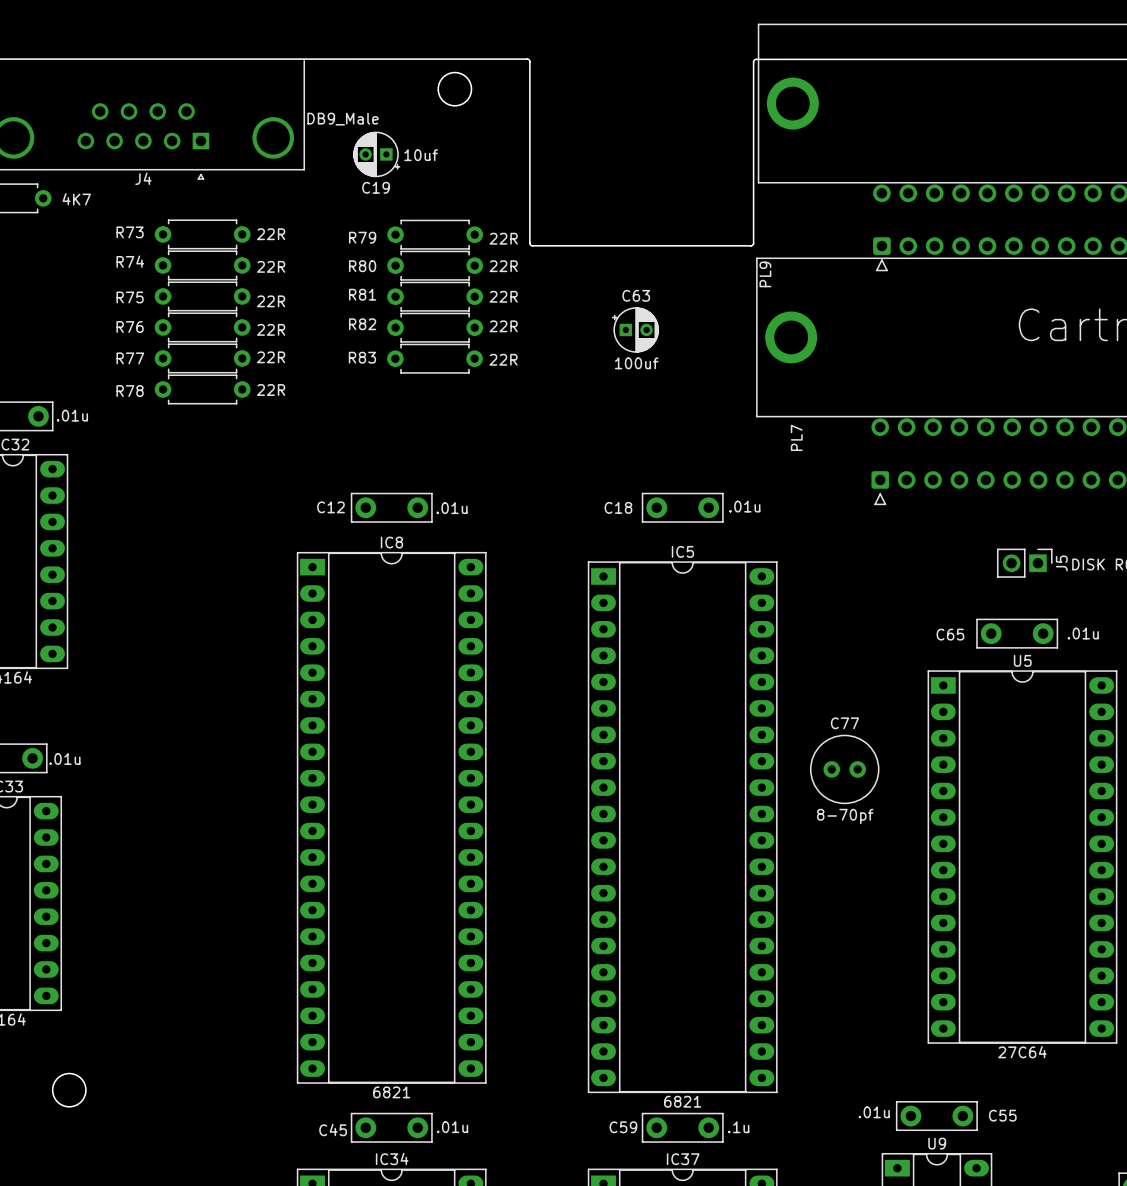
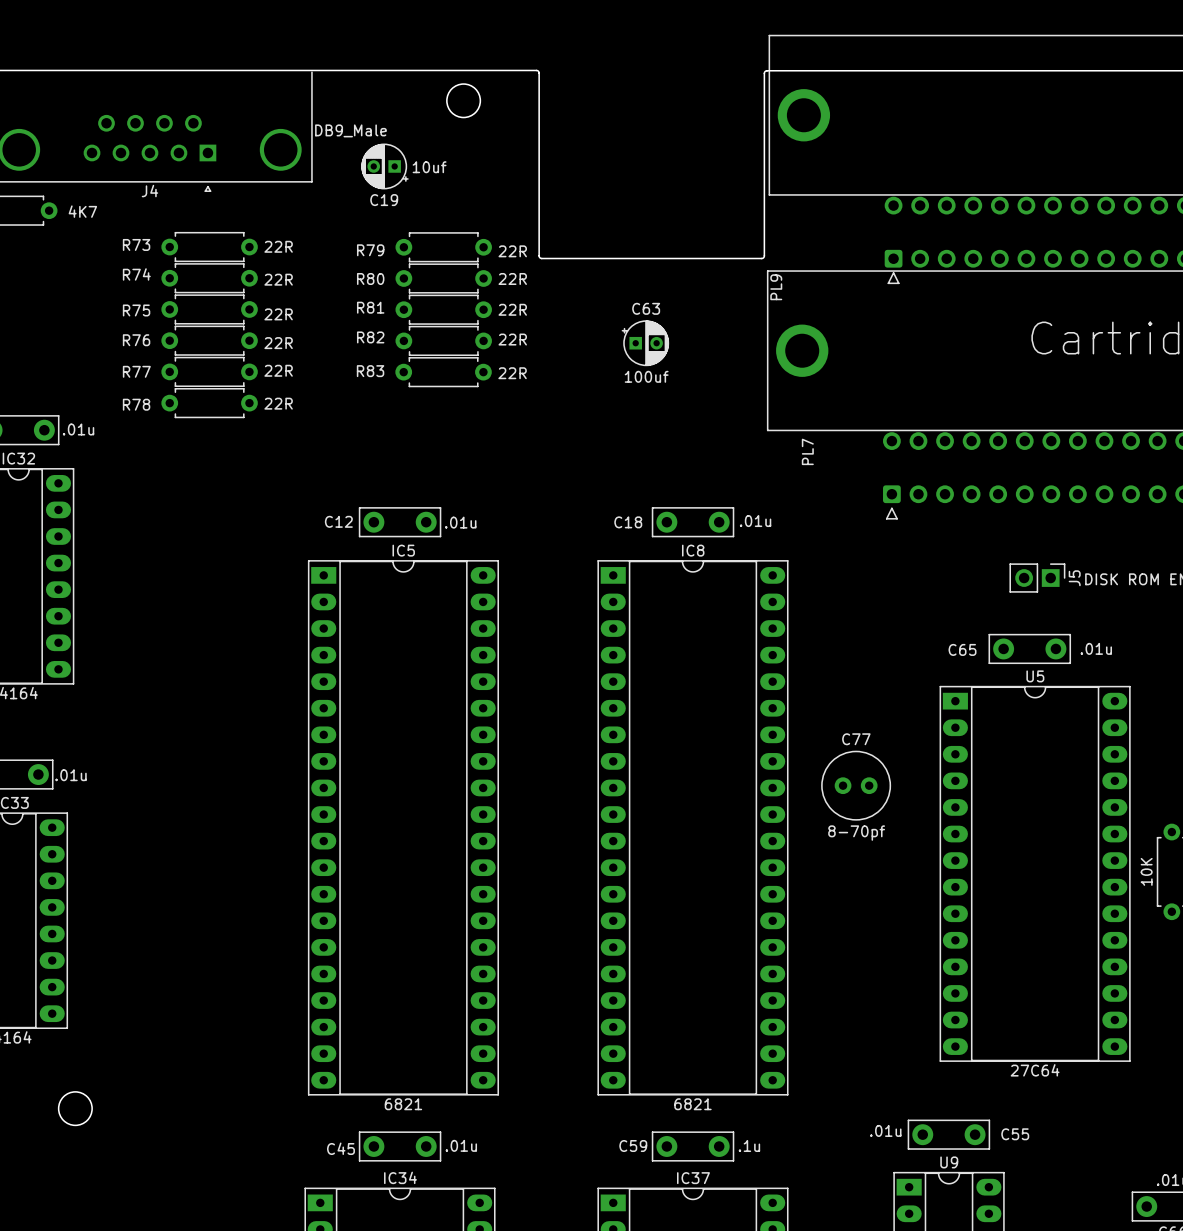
IC8 position: (391, 817) -> (692, 827)
IC5 position: (682, 827) -> (403, 827)

